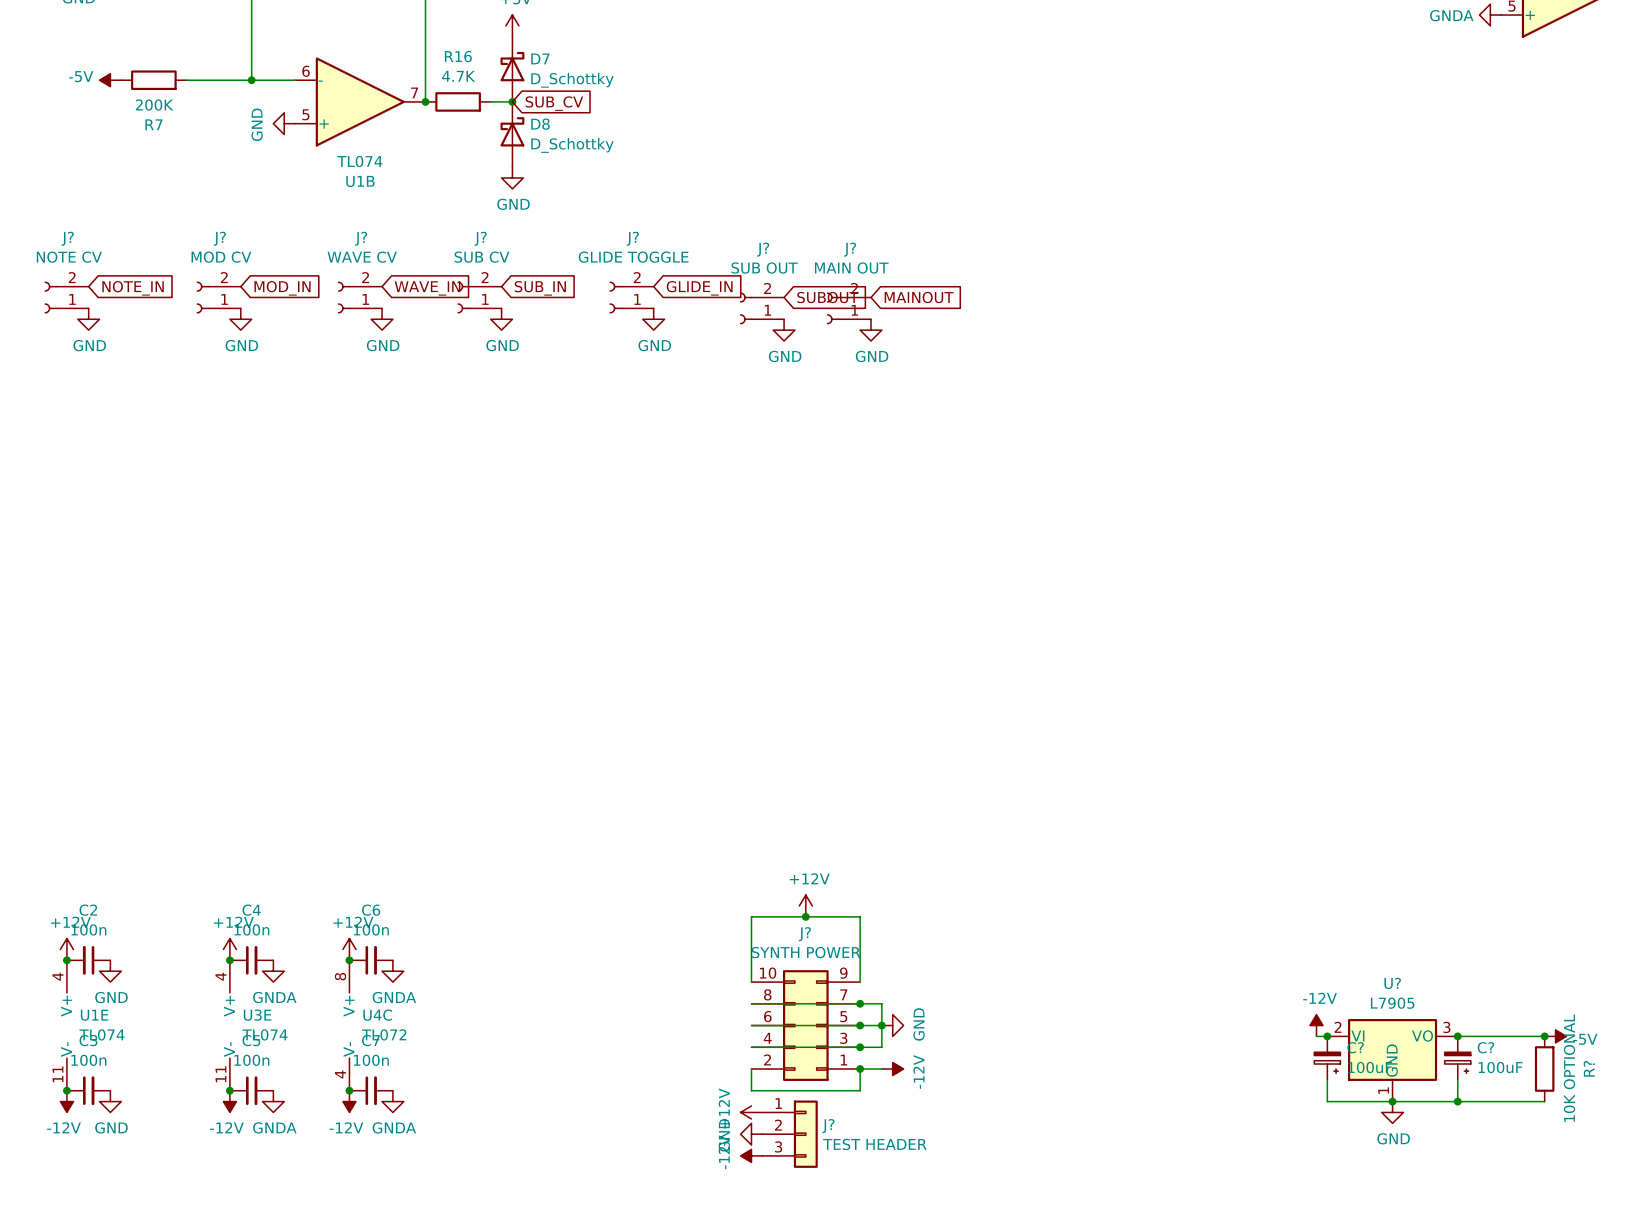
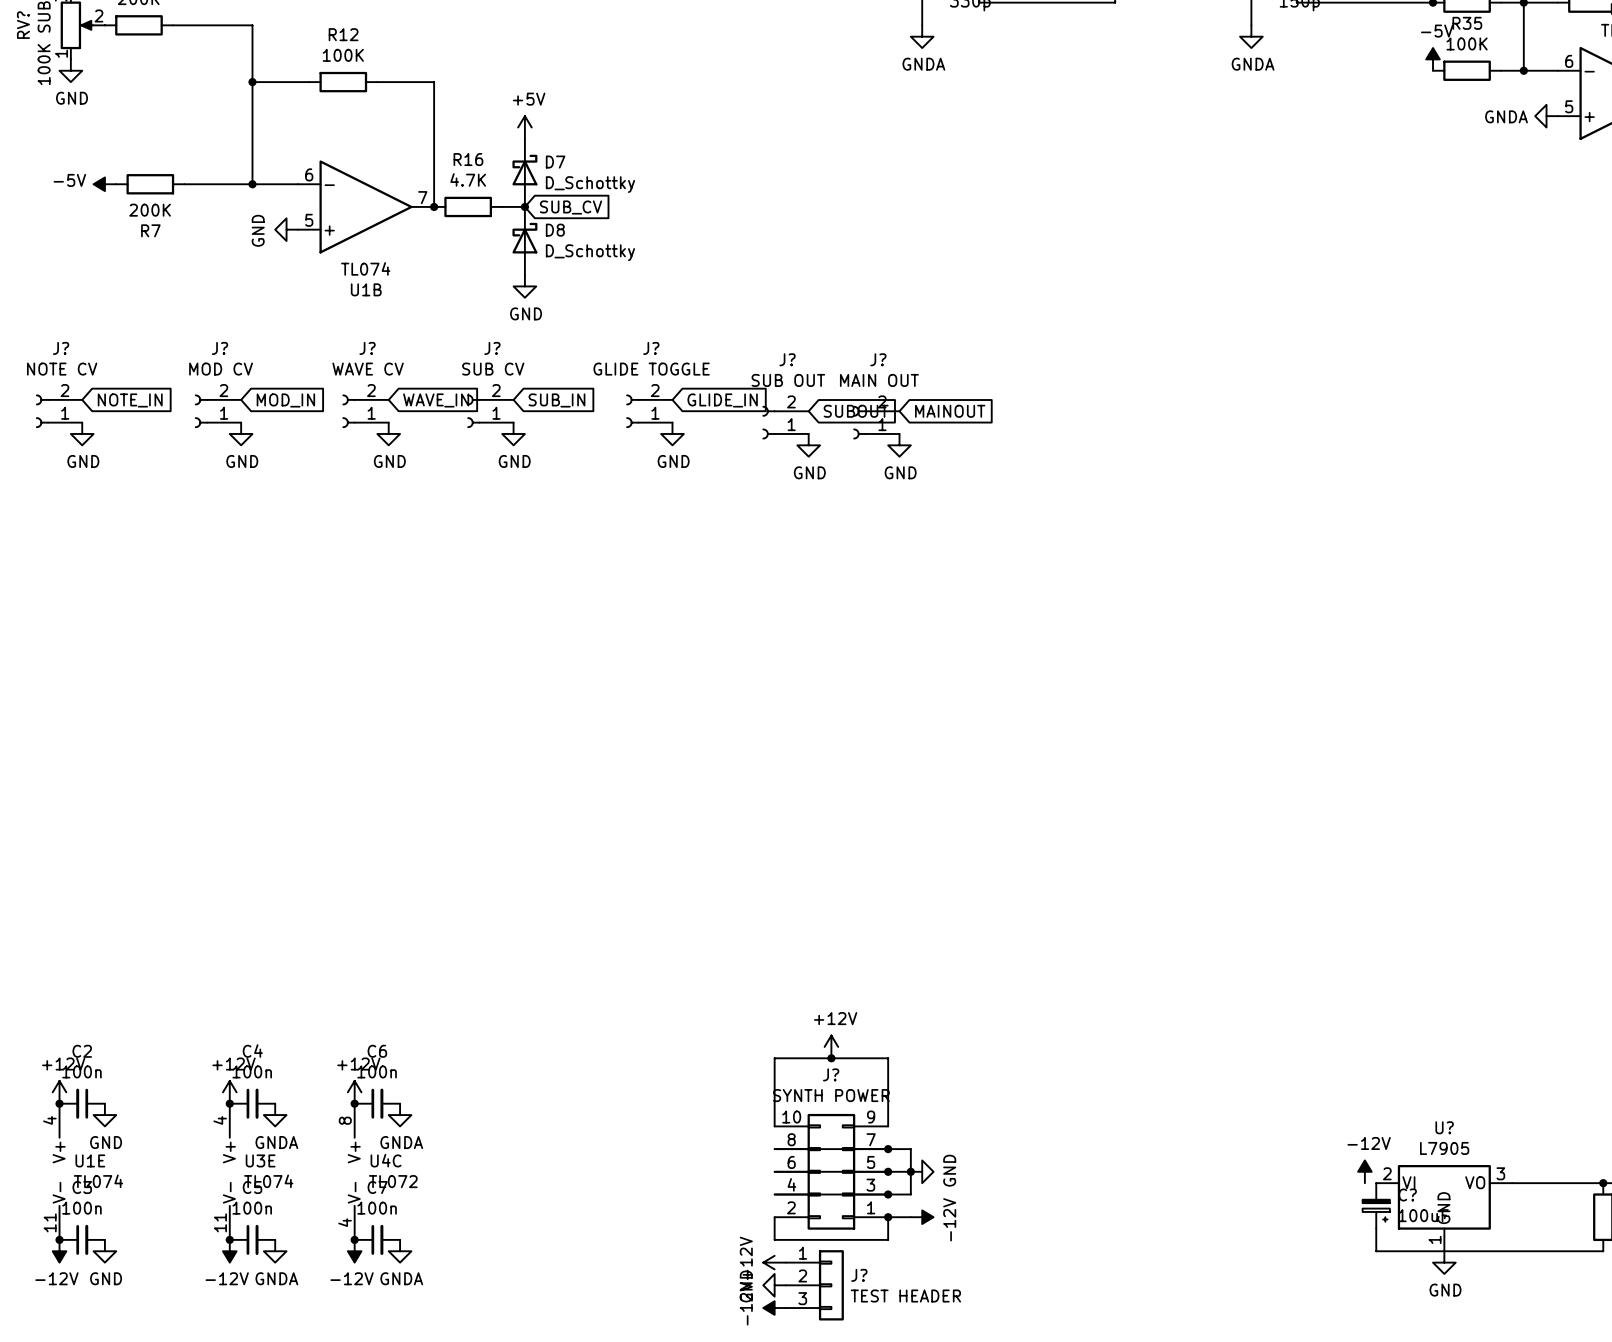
wire: (1316, 1036) (1327, 1036) -> none
junction: (1327, 1036) -> none
junction: (1457, 1036) -> none
C?: 100uF (1457, 1058) -> none
wire: (1457, 1079) (1457, 1101) -> none
junction: (1392, 1101) -> none
junction: (1457, 1101) -> none

